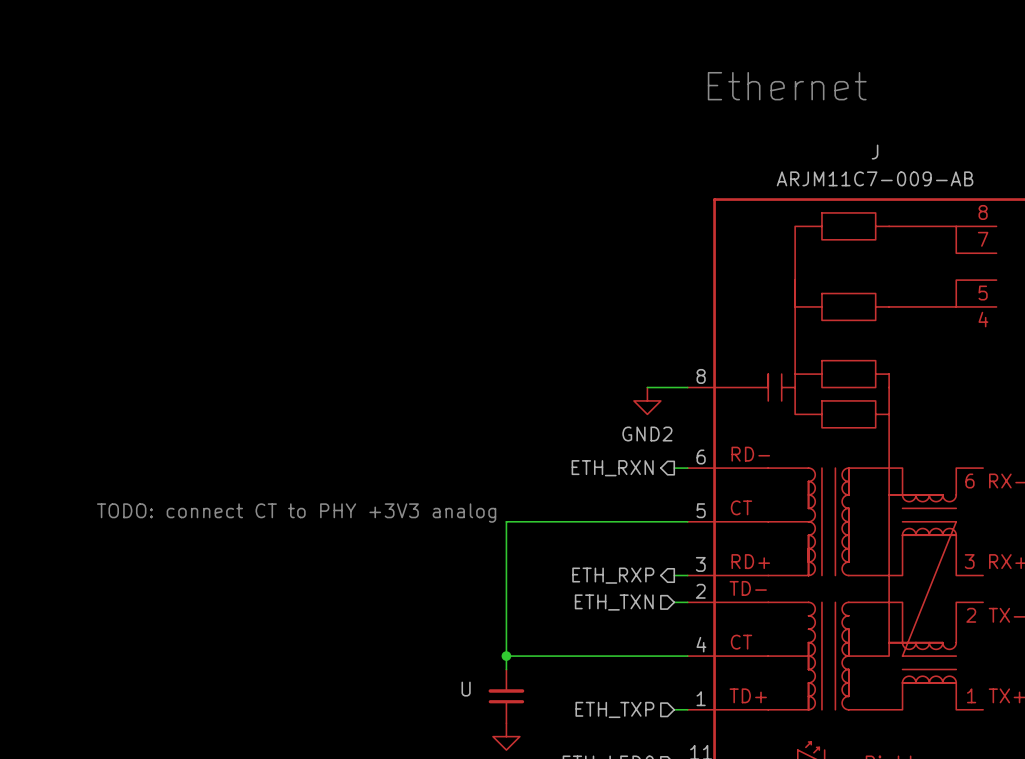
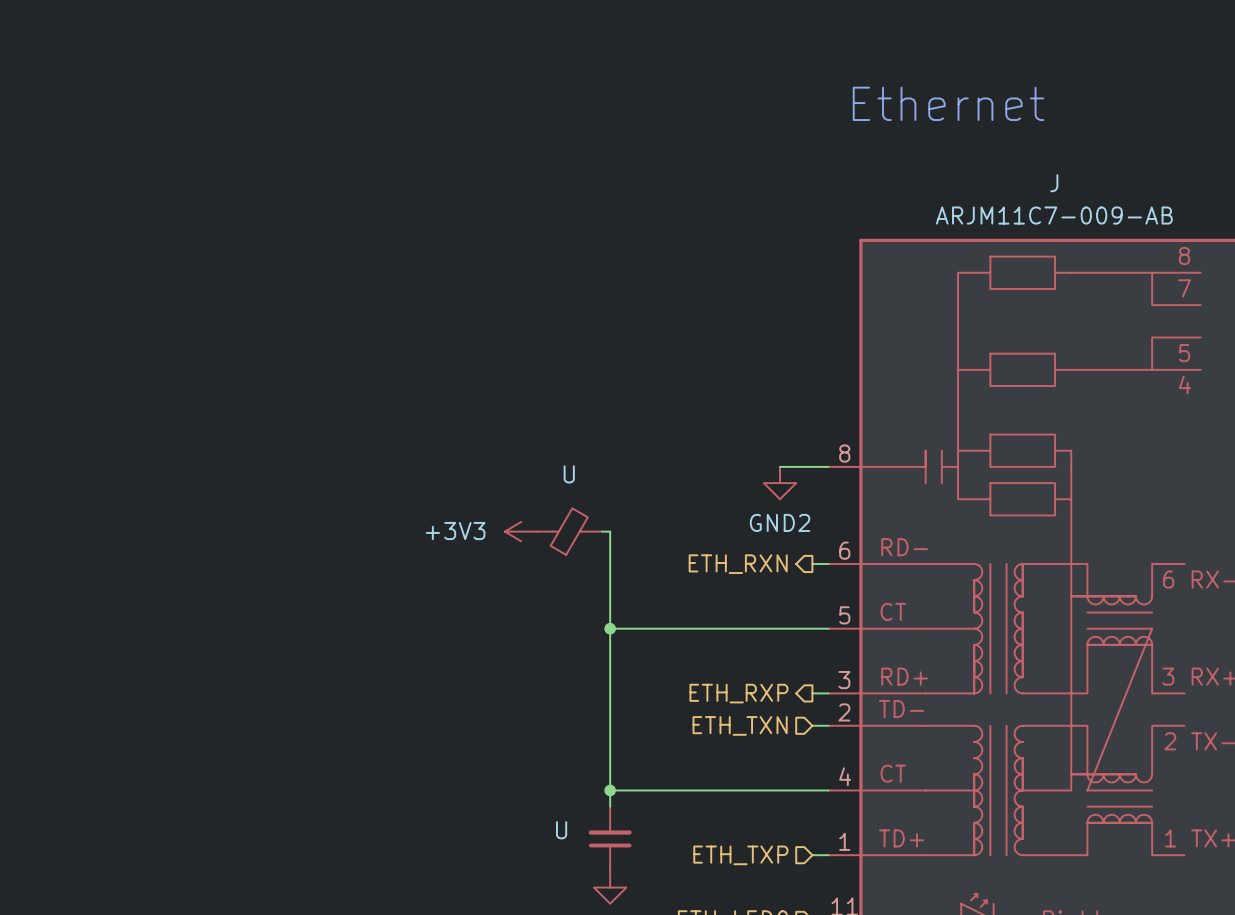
power symbol: none -> +3V3 (521, 531)
U: none -> (569, 531)
wire: none -> (602, 531) (610, 531) (610, 628)
text: TODO: connect CT to PHY +3V3 analog (296, 513) -> none
junction: none -> (610, 628)

